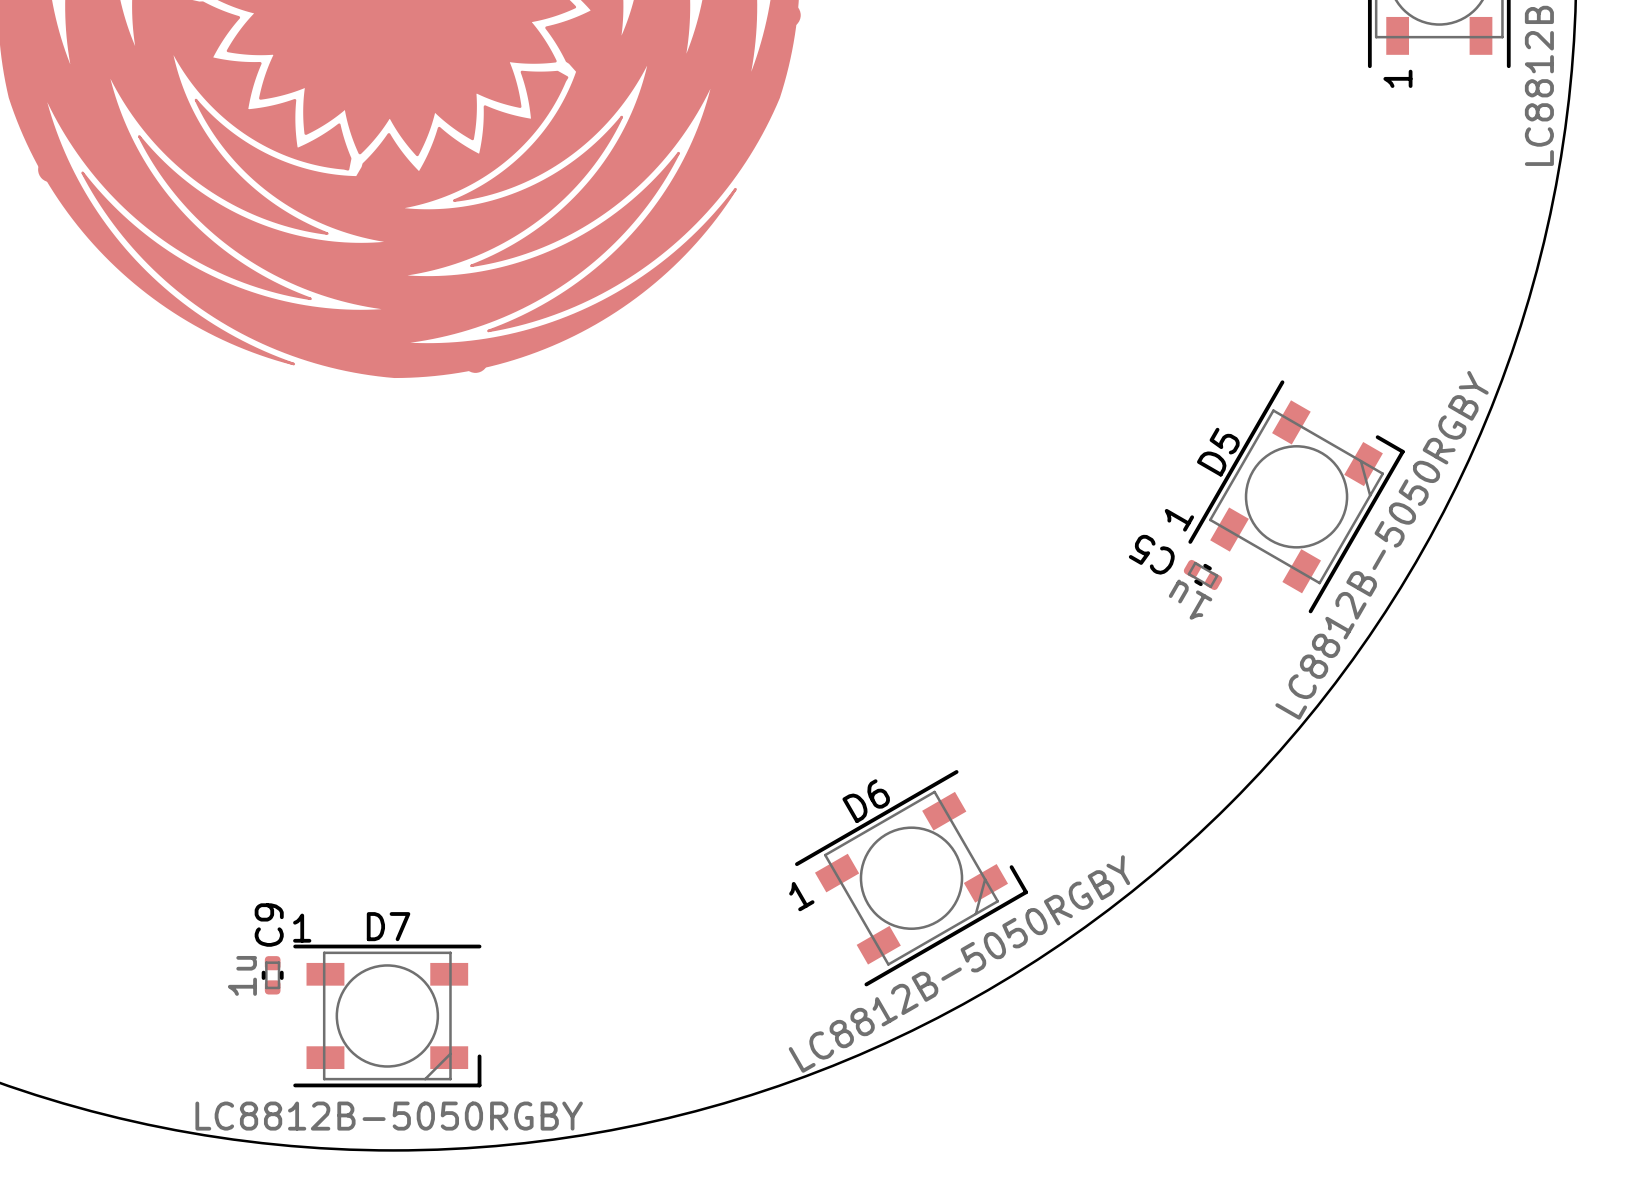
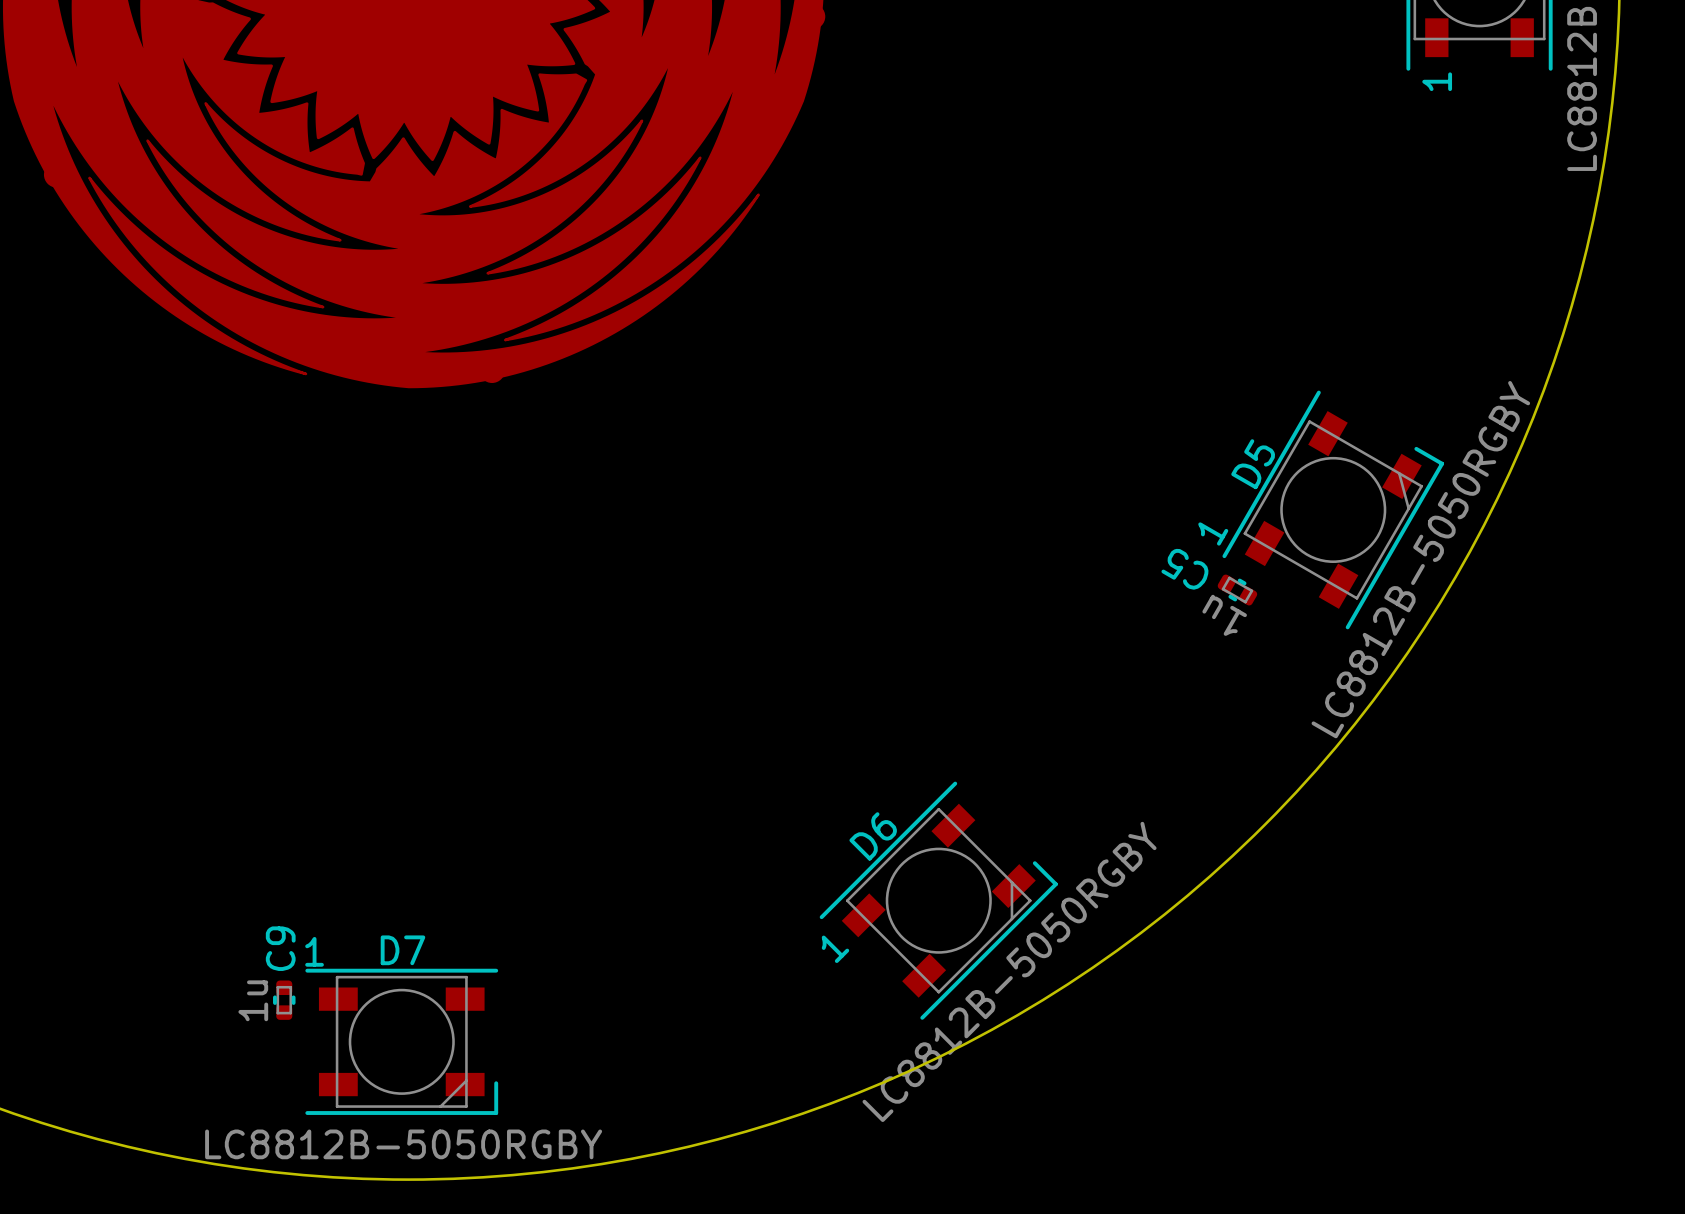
D6 rotation: 0° (911, 878) -> 15° counterclockwise (938, 900)

